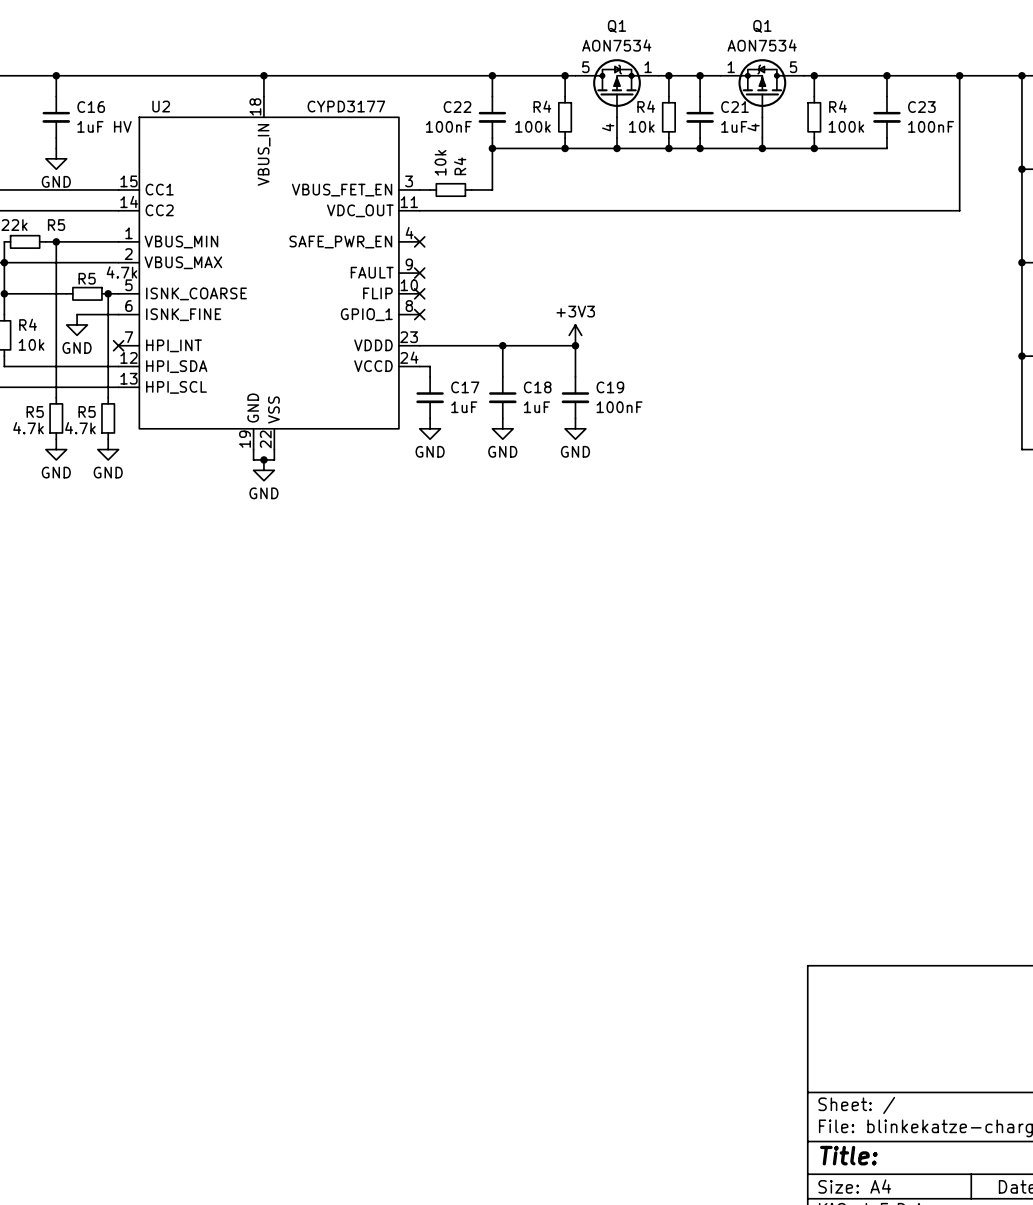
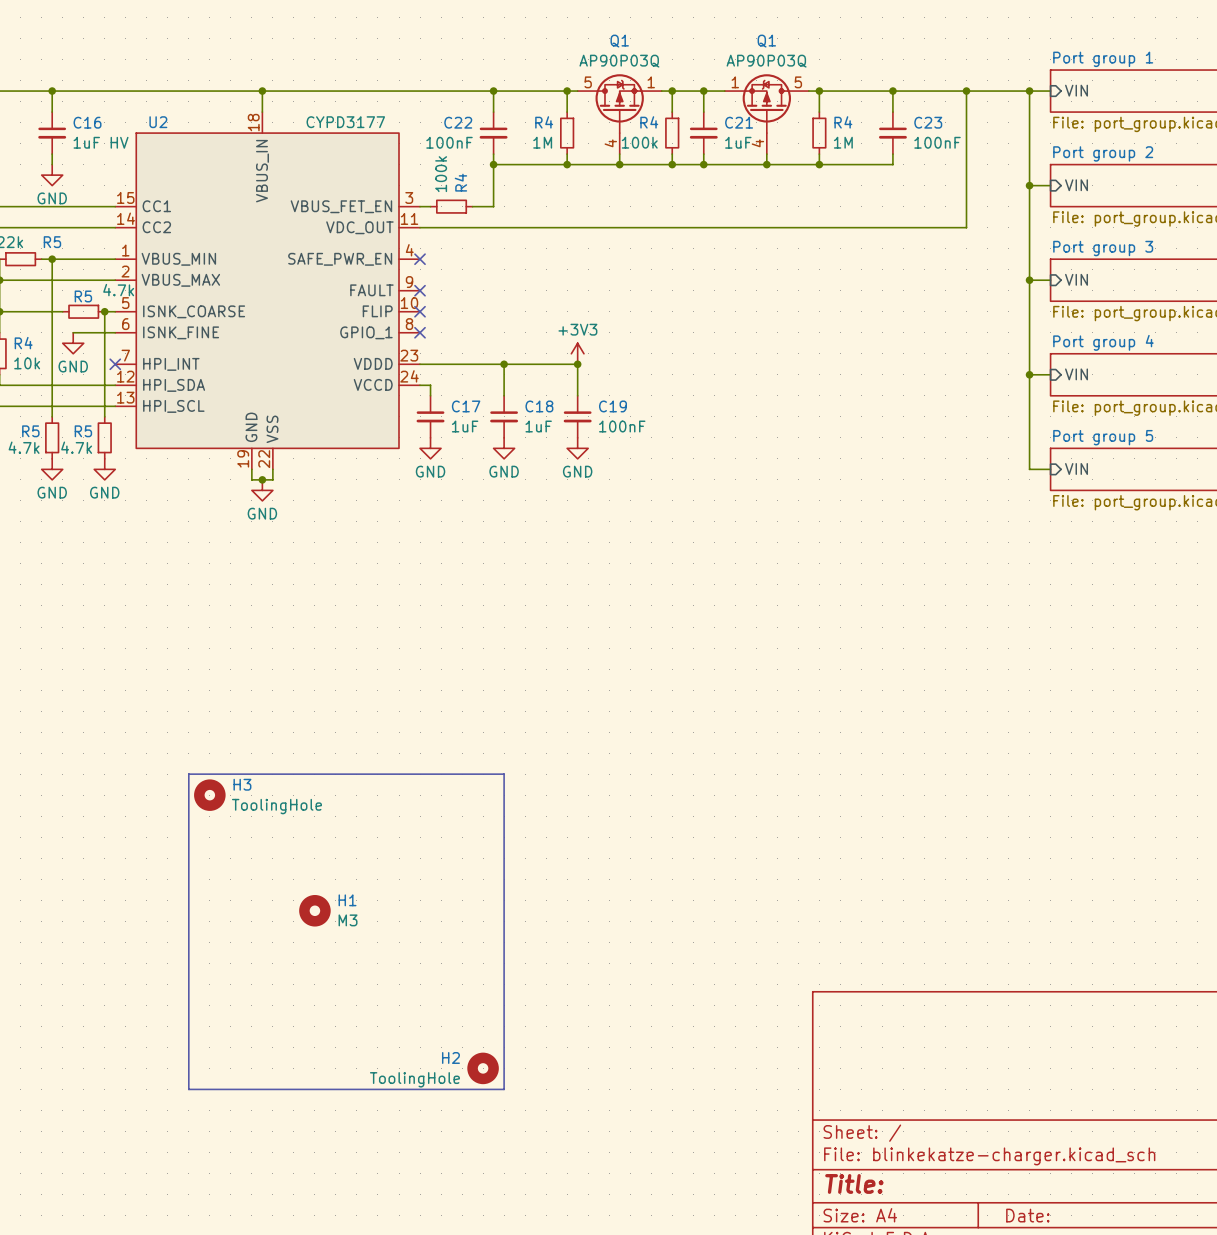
Q1 value: AON7534 (616, 45) -> AP90P03Q (619, 61)
Q1 value: AON7534 (762, 45) -> AP90P03Q (766, 61)
R4 value: 100k (532, 126) -> 1M (542, 142)
R4 value: 10k (641, 126) -> 100k (639, 142)
R4 value: 100k (846, 126) -> 1M (843, 142)
R4 value: 10k (440, 162) -> 100k (441, 174)
line: none -> (188, 774) (504, 774) (504, 1089) (188, 1089) (188, 774)
H3: none -> ToolingHole (209, 795)
H1: none -> M3 (314, 910)
H2: none -> ToolingHole (483, 1068)

